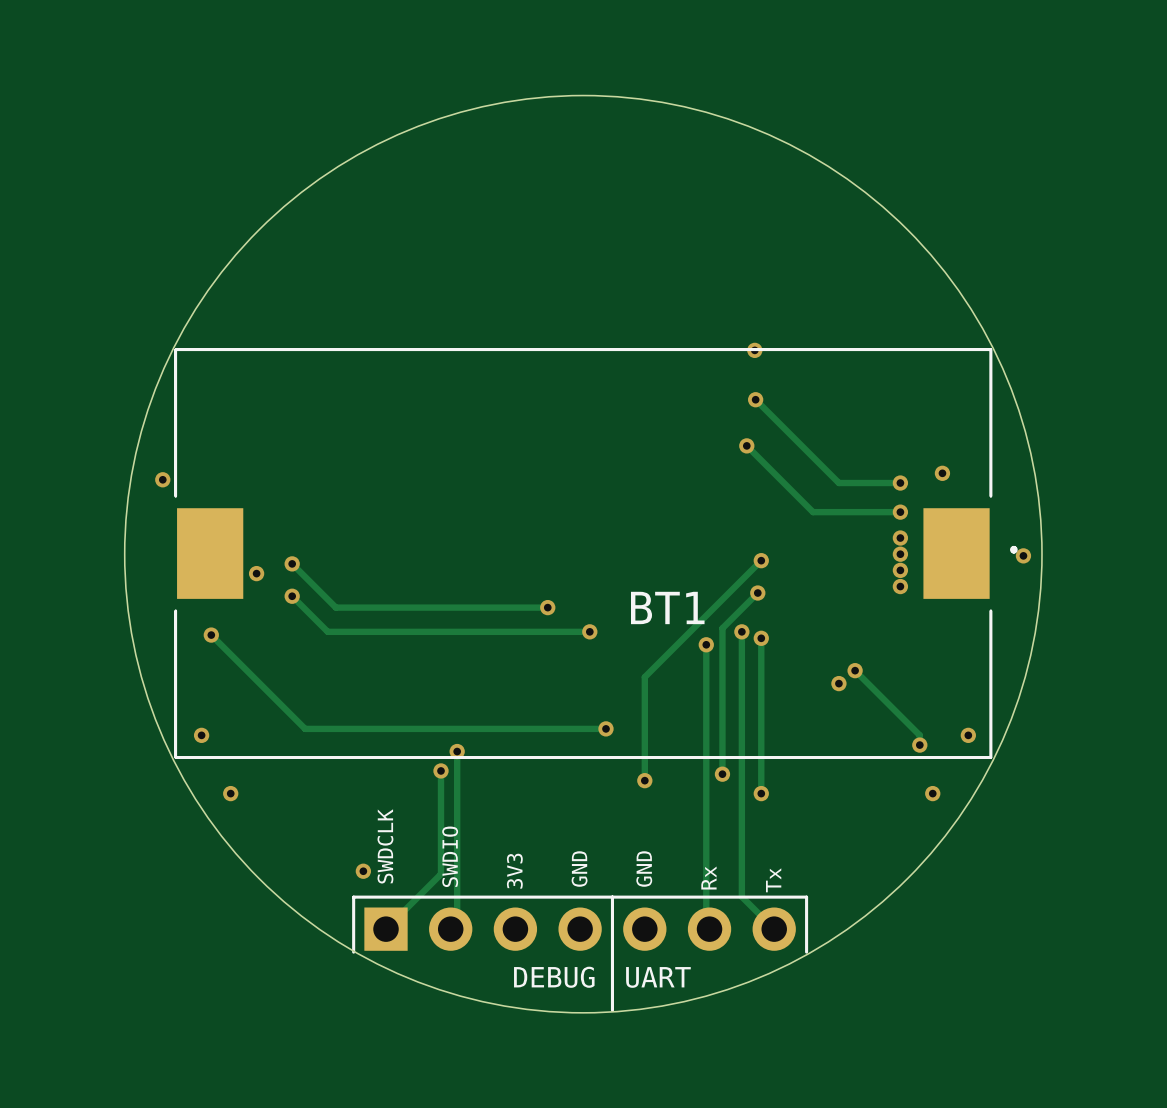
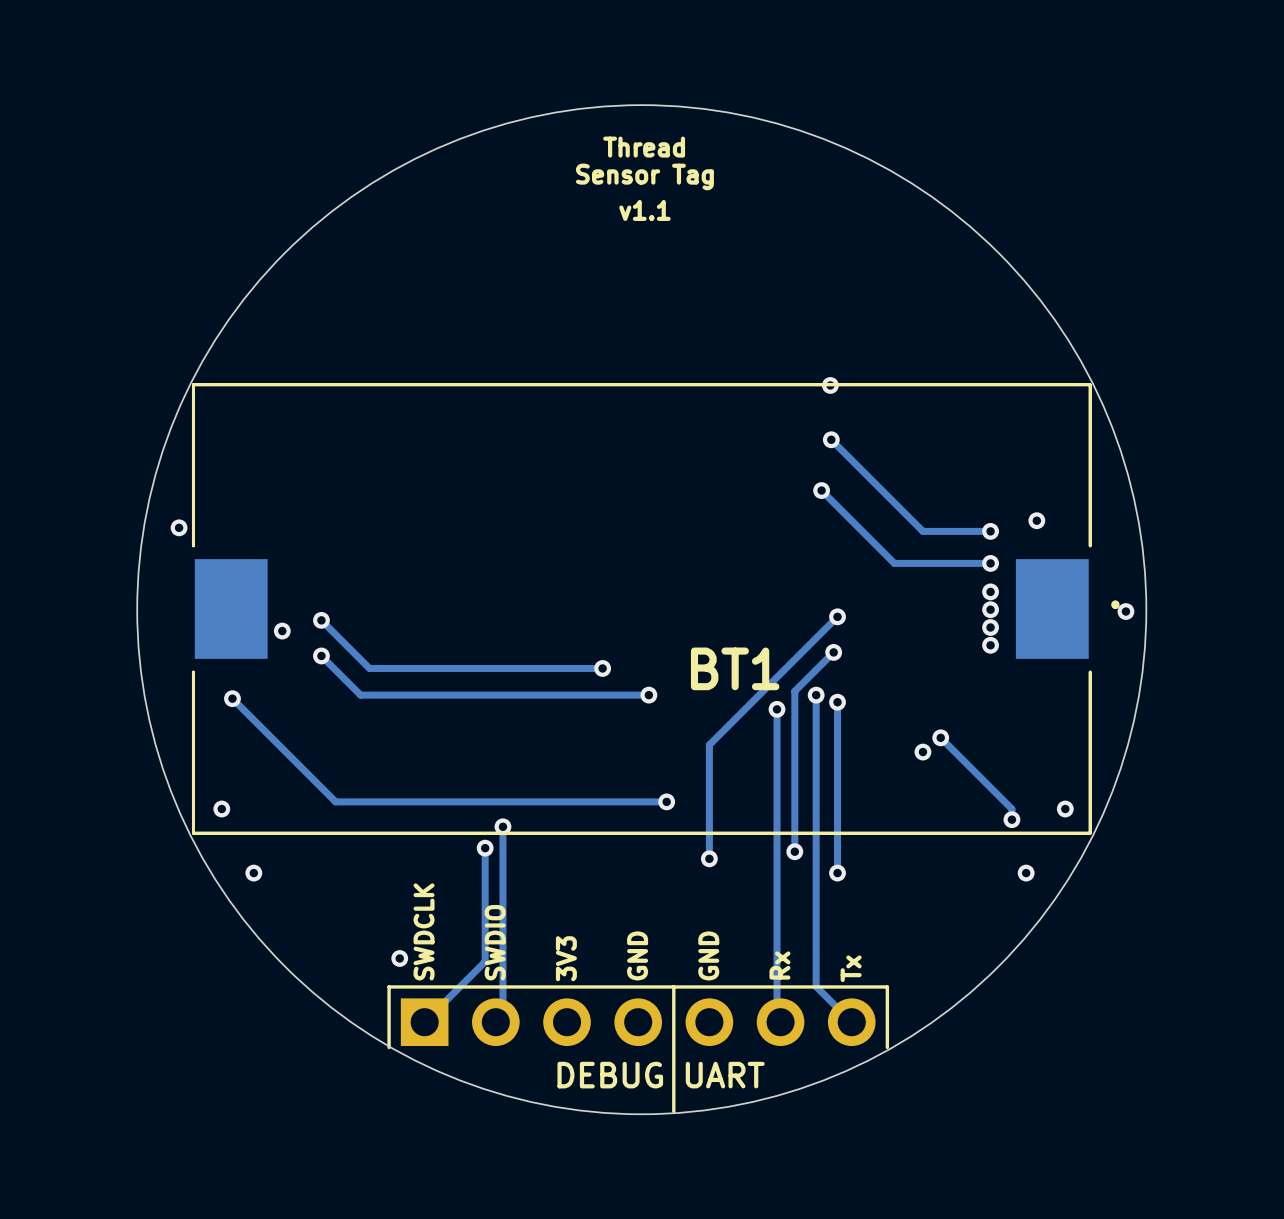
text: none -> Thread (644, 147)
text: none -> Sensor Tag (644, 176)
text: none -> v1.1 (644, 210)

